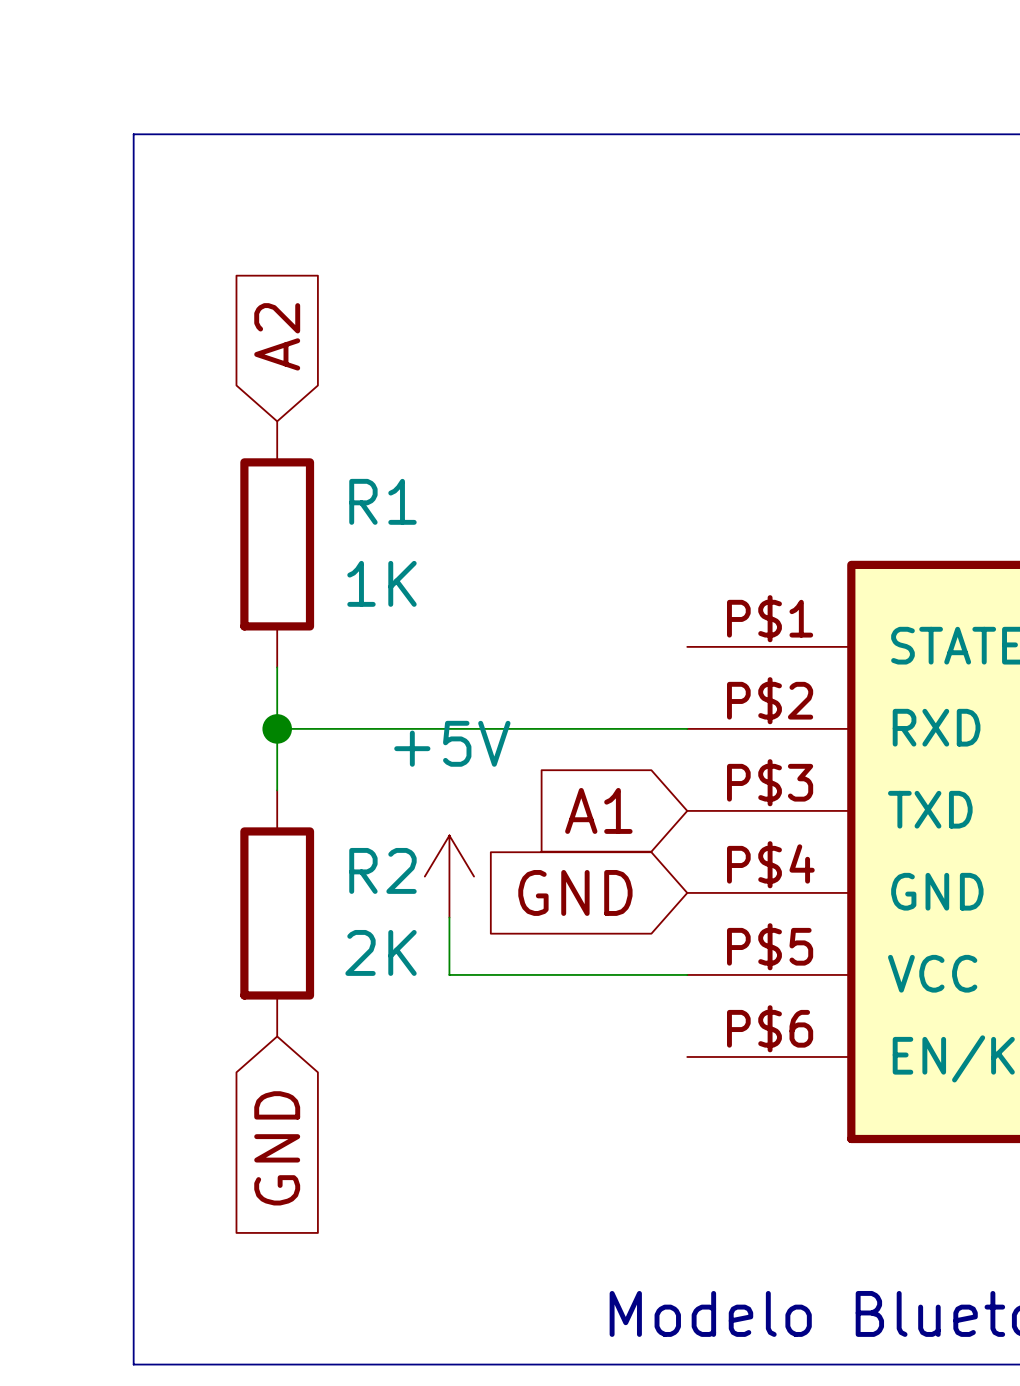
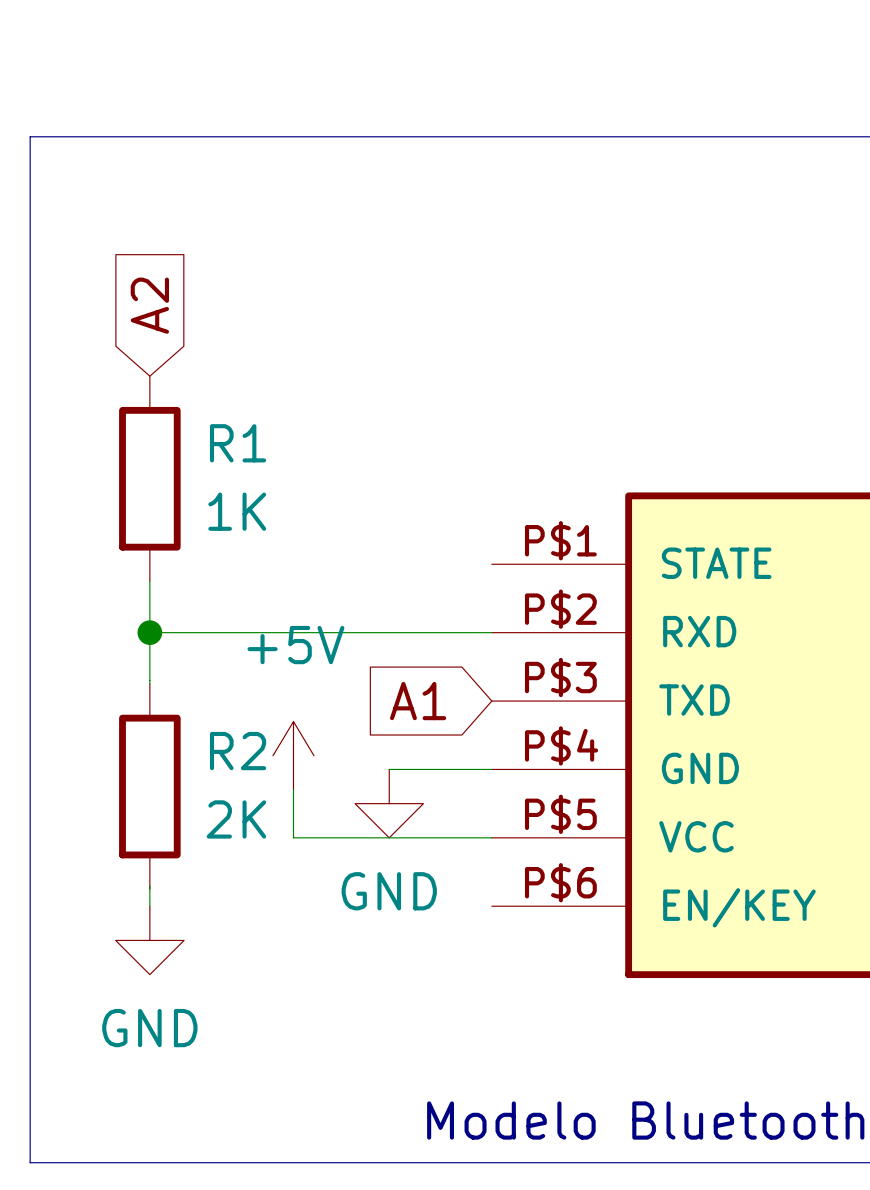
wire: none -> (389, 769) (491, 769)
global label: GND (575, 892) -> none
power symbol: none -> GND (389, 803)
wire: none -> (149, 885) (149, 906)
power symbol: none -> GND (149, 940)
global label: GND (277, 1148) -> none

